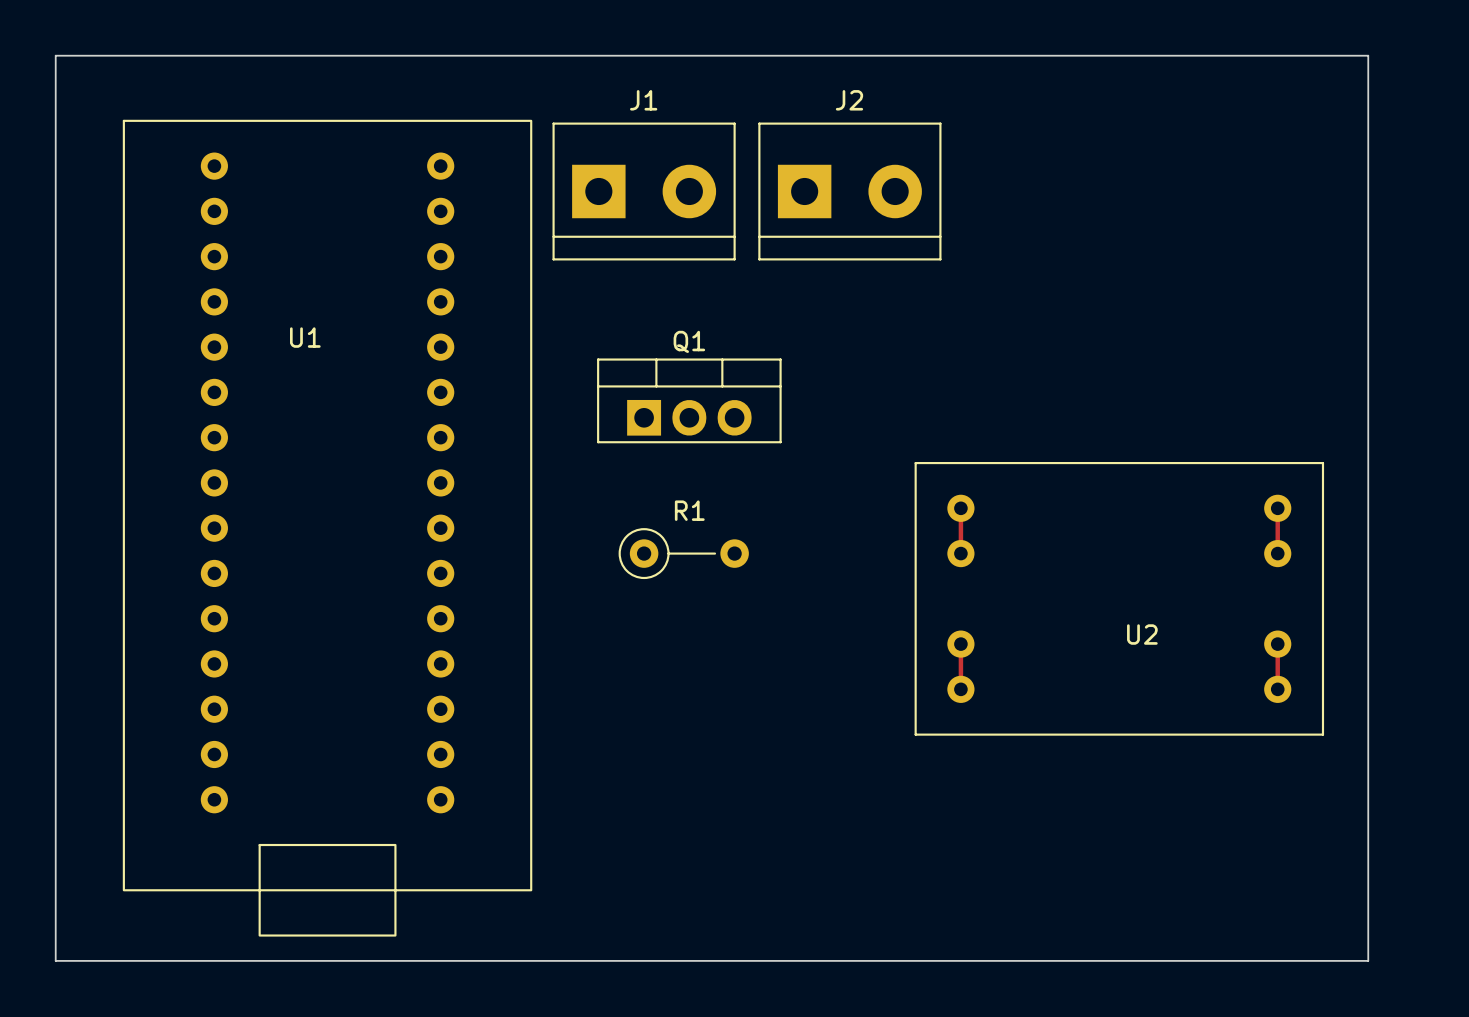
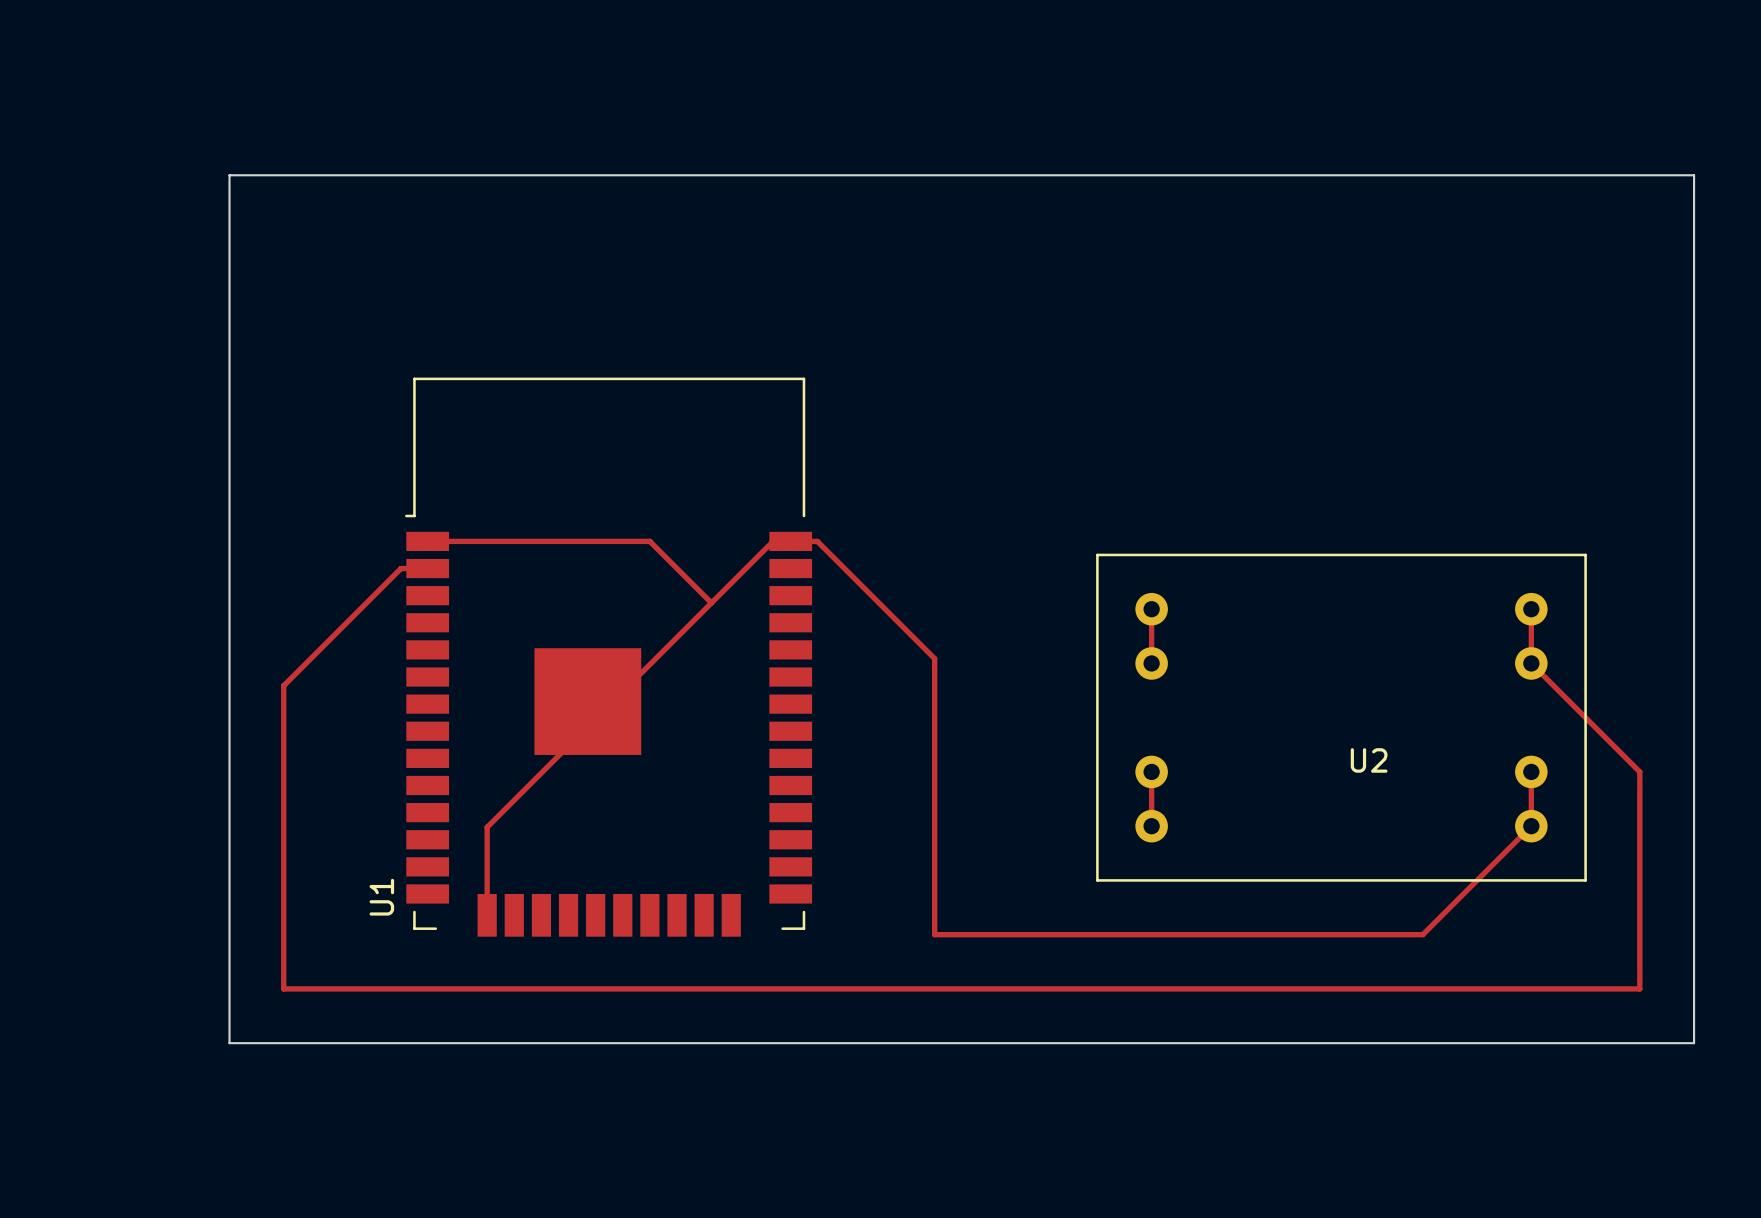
board edge: (55, 55) (1368, 55) (1368, 960) (55, 960) (55, 55) -> (229, 175) (229, 1043) (1694, 1043) (1694, 175) (229, 175)
U1 footprint: [122, 119, 533, 937] -> [405, 377, 813, 937]
J1: (644, 191) -> none
J2: (849, 191) -> none
U1 name position: U1 (305, 337) -> U1 (381, 897)
Q1: (689, 400) -> none
top track: none -> (427, 541) (649, 541) (711, 602)
top track: none -> (427, 568) (400, 568) (283, 685) (283, 988) (1639, 988) (1639, 771) (1531, 663)
R1: (683, 553) -> none
top track: none -> (1531, 826) (1422, 934) (934, 934) (934, 658) (817, 541) (773, 541) (487, 827) (487, 915)

